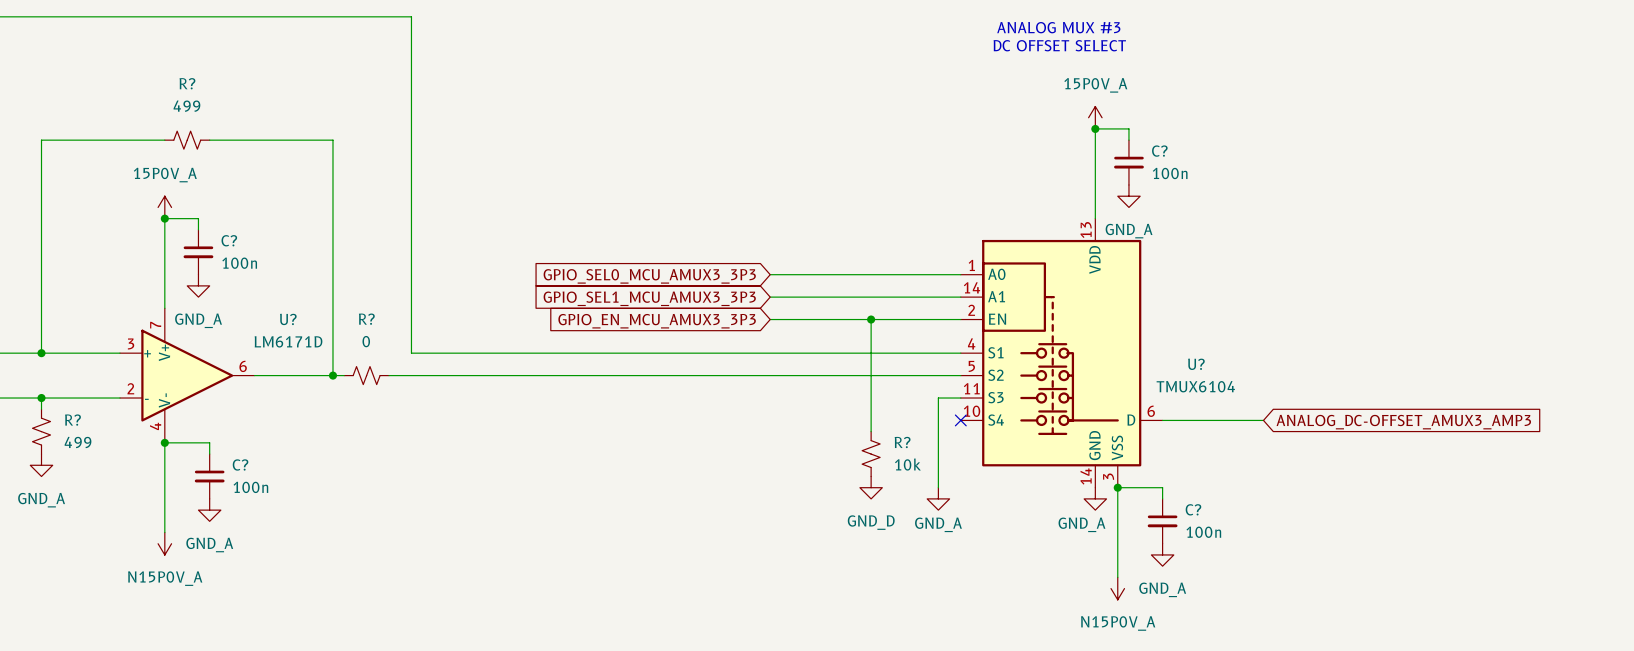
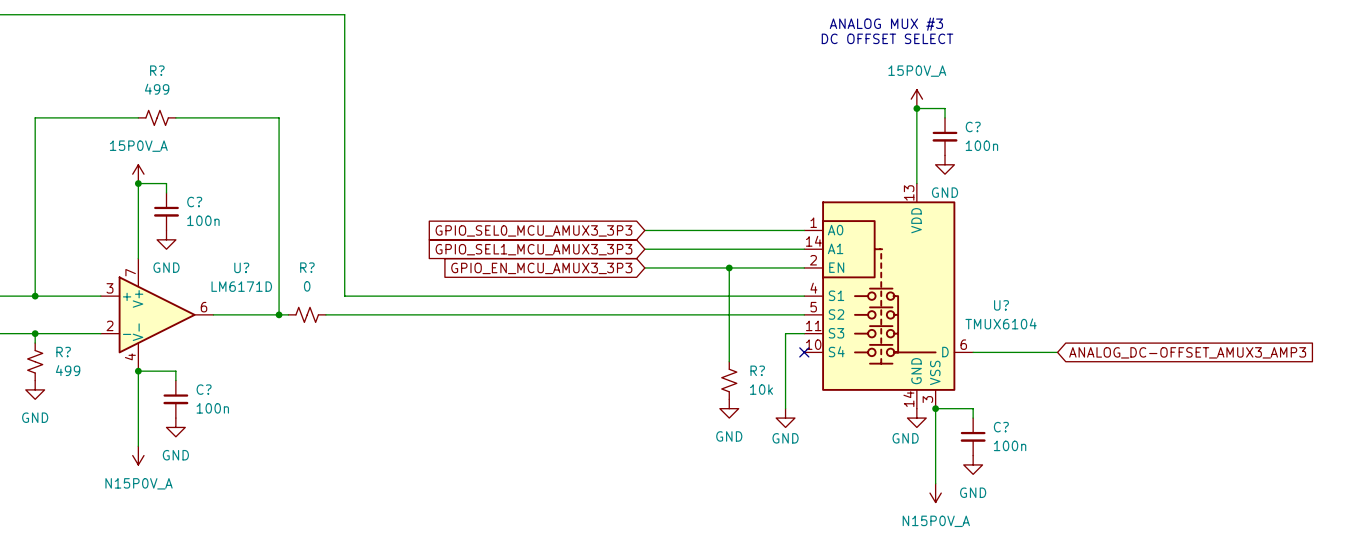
power symbol: GND_A (1128, 196) -> GND (945, 164)
power symbol: GND_A (198, 285) -> GND (166, 239)
power symbol: GND_A (41, 465) -> GND (35, 389)
power symbol: GND_D (871, 487) -> GND (729, 408)
power symbol: GND_A (938, 498) -> GND (785, 418)
power symbol: GND_A (1095, 498) -> GND (916, 418)
power symbol: GND_A (209, 510) -> GND (175, 427)
power symbol: GND_A (1162, 554) -> GND (973, 464)

